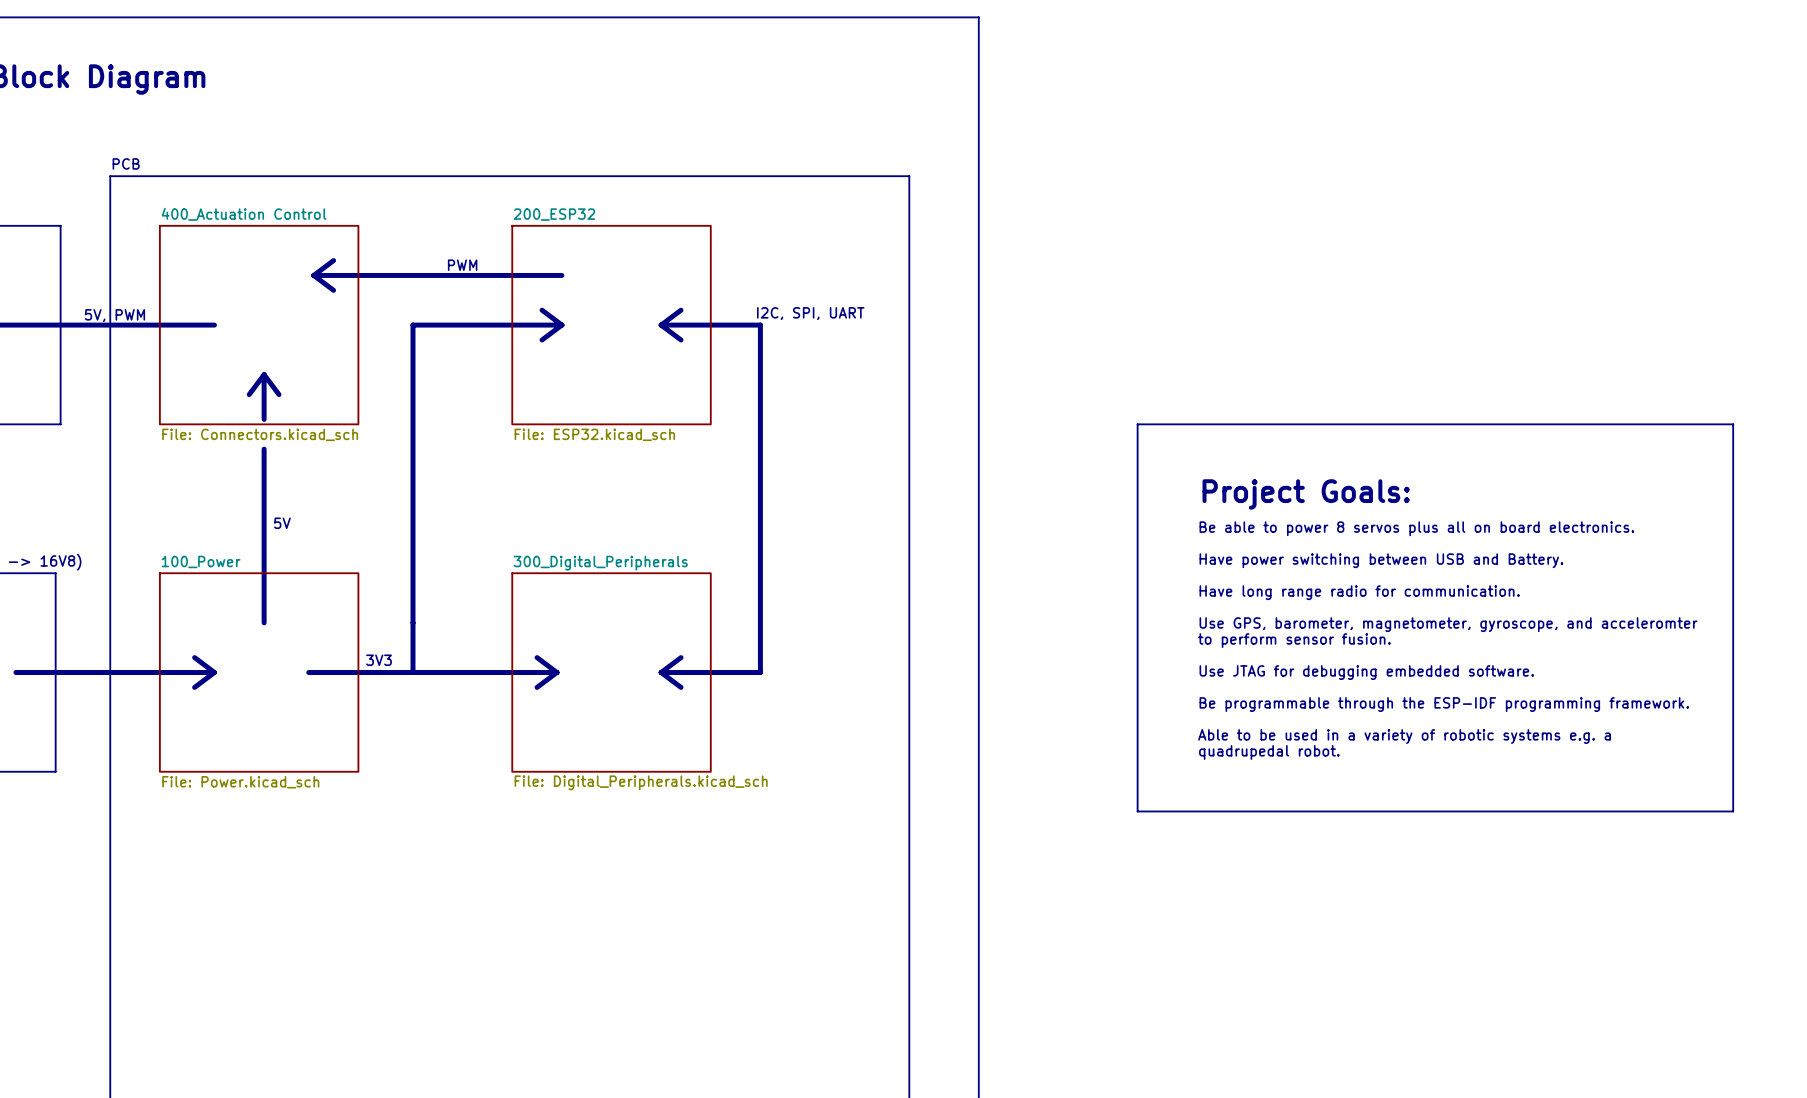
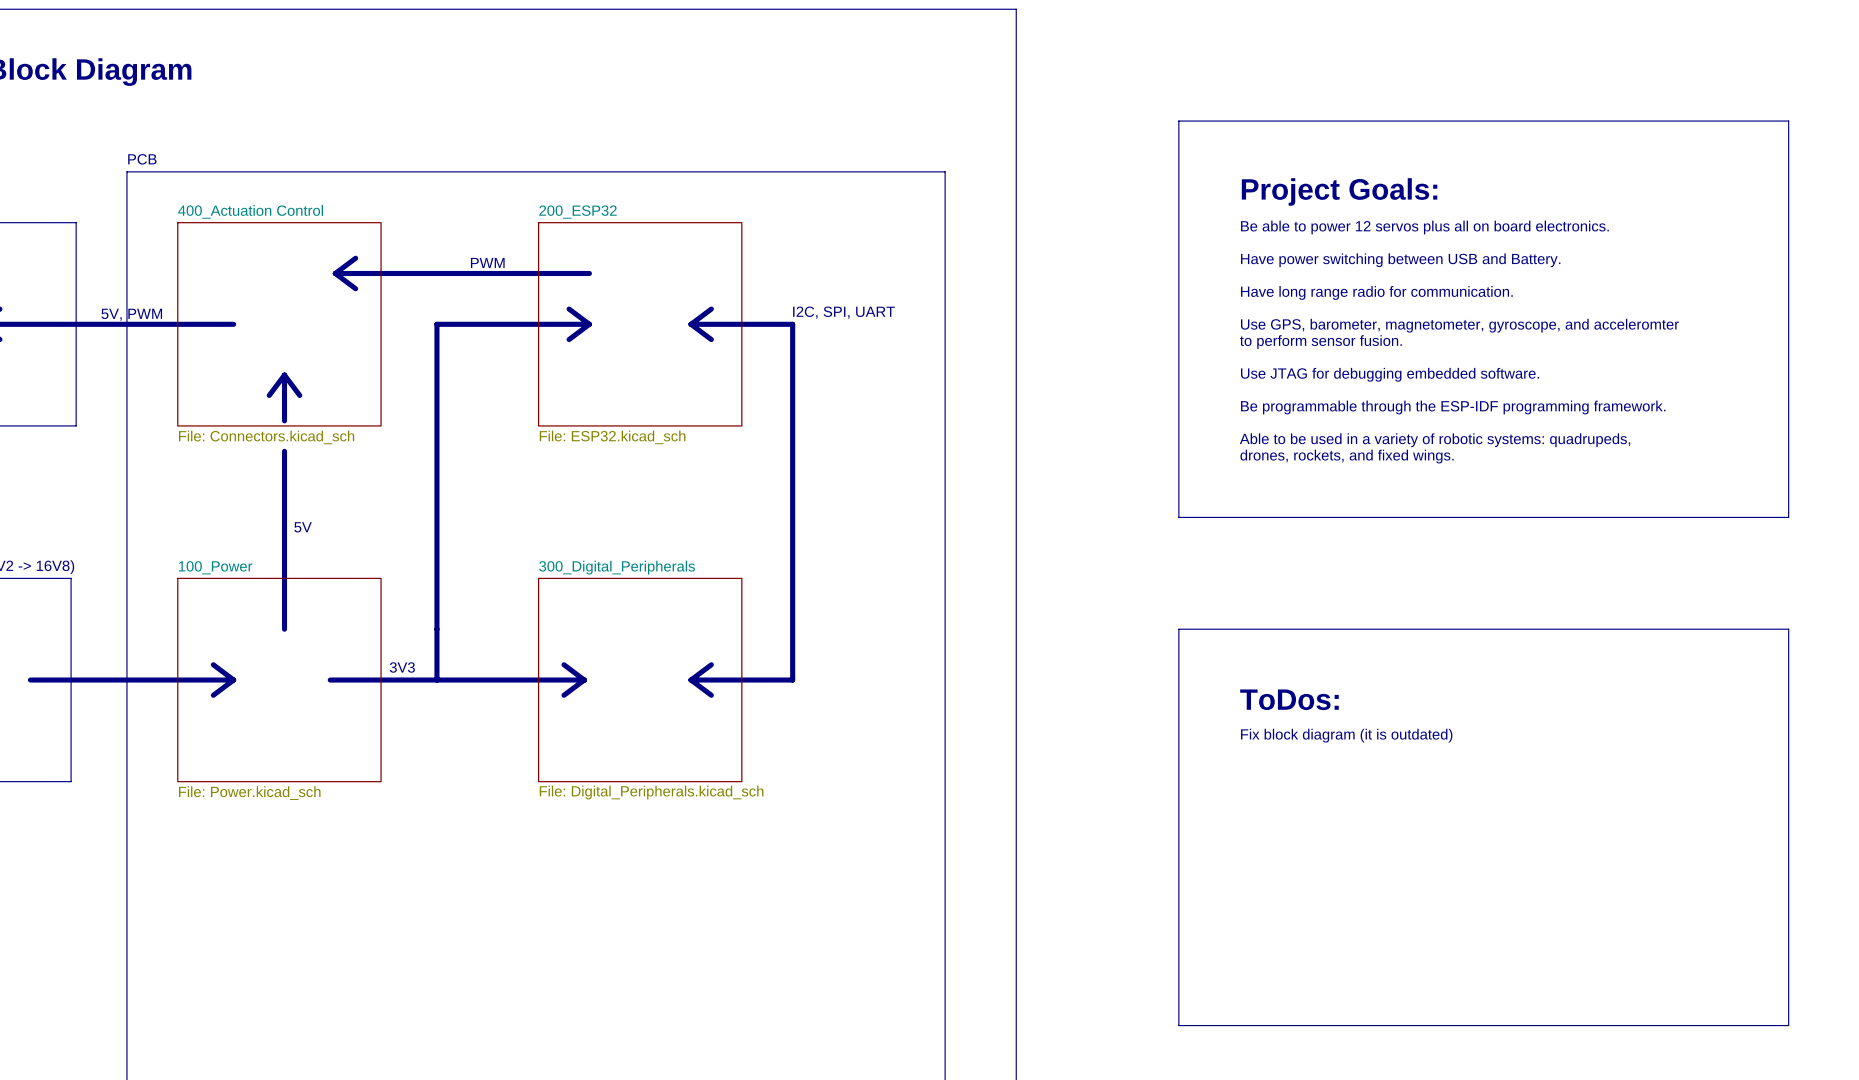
text: none -> Project Goals: (1339, 191)
text: none -> Be able to power 12 servos plus all on board electronics. (1424, 227)
text: none -> Have power switching between USB and Battery. (1400, 260)
text: none -> Have long range radio for communication. (1376, 292)
text: none -> Use GPS, barometer, magnetometer, gyroscope, and acceleromter (1459, 325)
text: none -> to perform sensor fusion. (1320, 342)
text: none -> Use JTAG for debugging embedded software. (1390, 374)
text: none -> Be programmable through the ESP-IDF programming framework. (1453, 407)
line: (1137, 424) (1733, 424) -> (1178, 425) (1178, 121) (1788, 121) (1788, 425)
text: none -> Able to be used in a variety of robotic systems: quadrupeds, (1435, 440)
text: none -> drones, rockets, and fixed wings. (1347, 456)
text: Project Goals: (1306, 494) -> none
line: (1137, 513) (1137, 622) -> (1178, 517) (1788, 517)
line: (1733, 513) (1733, 622) -> (1178, 629) (1788, 629)
text: Be able to power 8 servos plus all on board electronics. (1416, 528) -> none
text: Have power switching between USB and Battery. (1381, 560) -> none
text: Have long range radio for communication. (1359, 592) -> none
text: Use GPS, barometer, magnetometer, gyroscope, and acceleromter (1448, 624) -> none
text: to perform sensor fusion. (1294, 640) -> none
text: Use JTAG for debugging embedded software. (1366, 672) -> none
text: Be programmable through the ESP-IDF programming framework. (1444, 704) -> ToDos: (1289, 699)
text: none -> Fix block diagram (it is outdated) (1346, 735)
text: Able to be used in a variety of robotic systems e.g. a (1404, 736) -> none
text: quadrupedal robot. (1269, 752) -> none
line: (1137, 811) (1733, 811) -> (1178, 822) (1178, 1025) (1788, 1025) (1788, 822)

